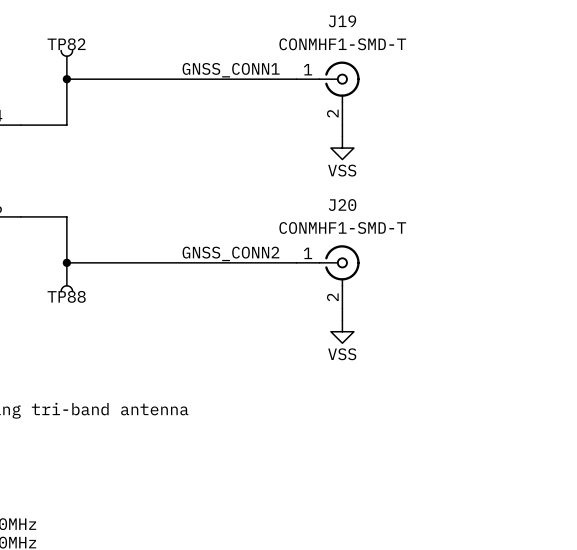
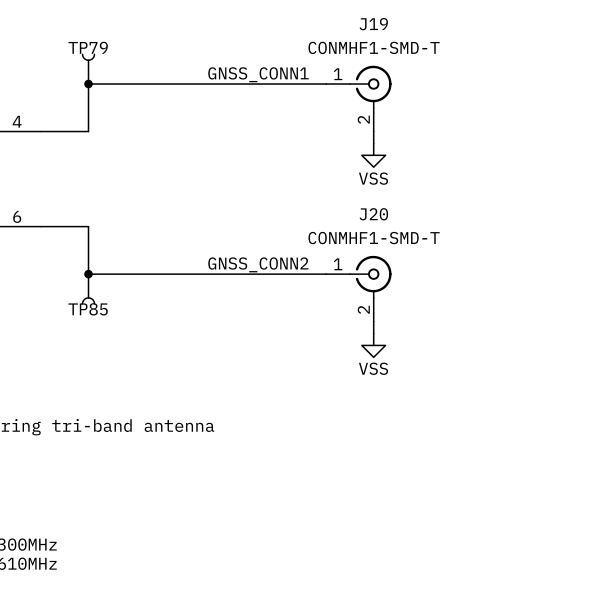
TP82 name: TP82 (66, 44) -> TP79 (88, 47)
TP88 name: TP88 (66, 296) -> TP85 (88, 309)

